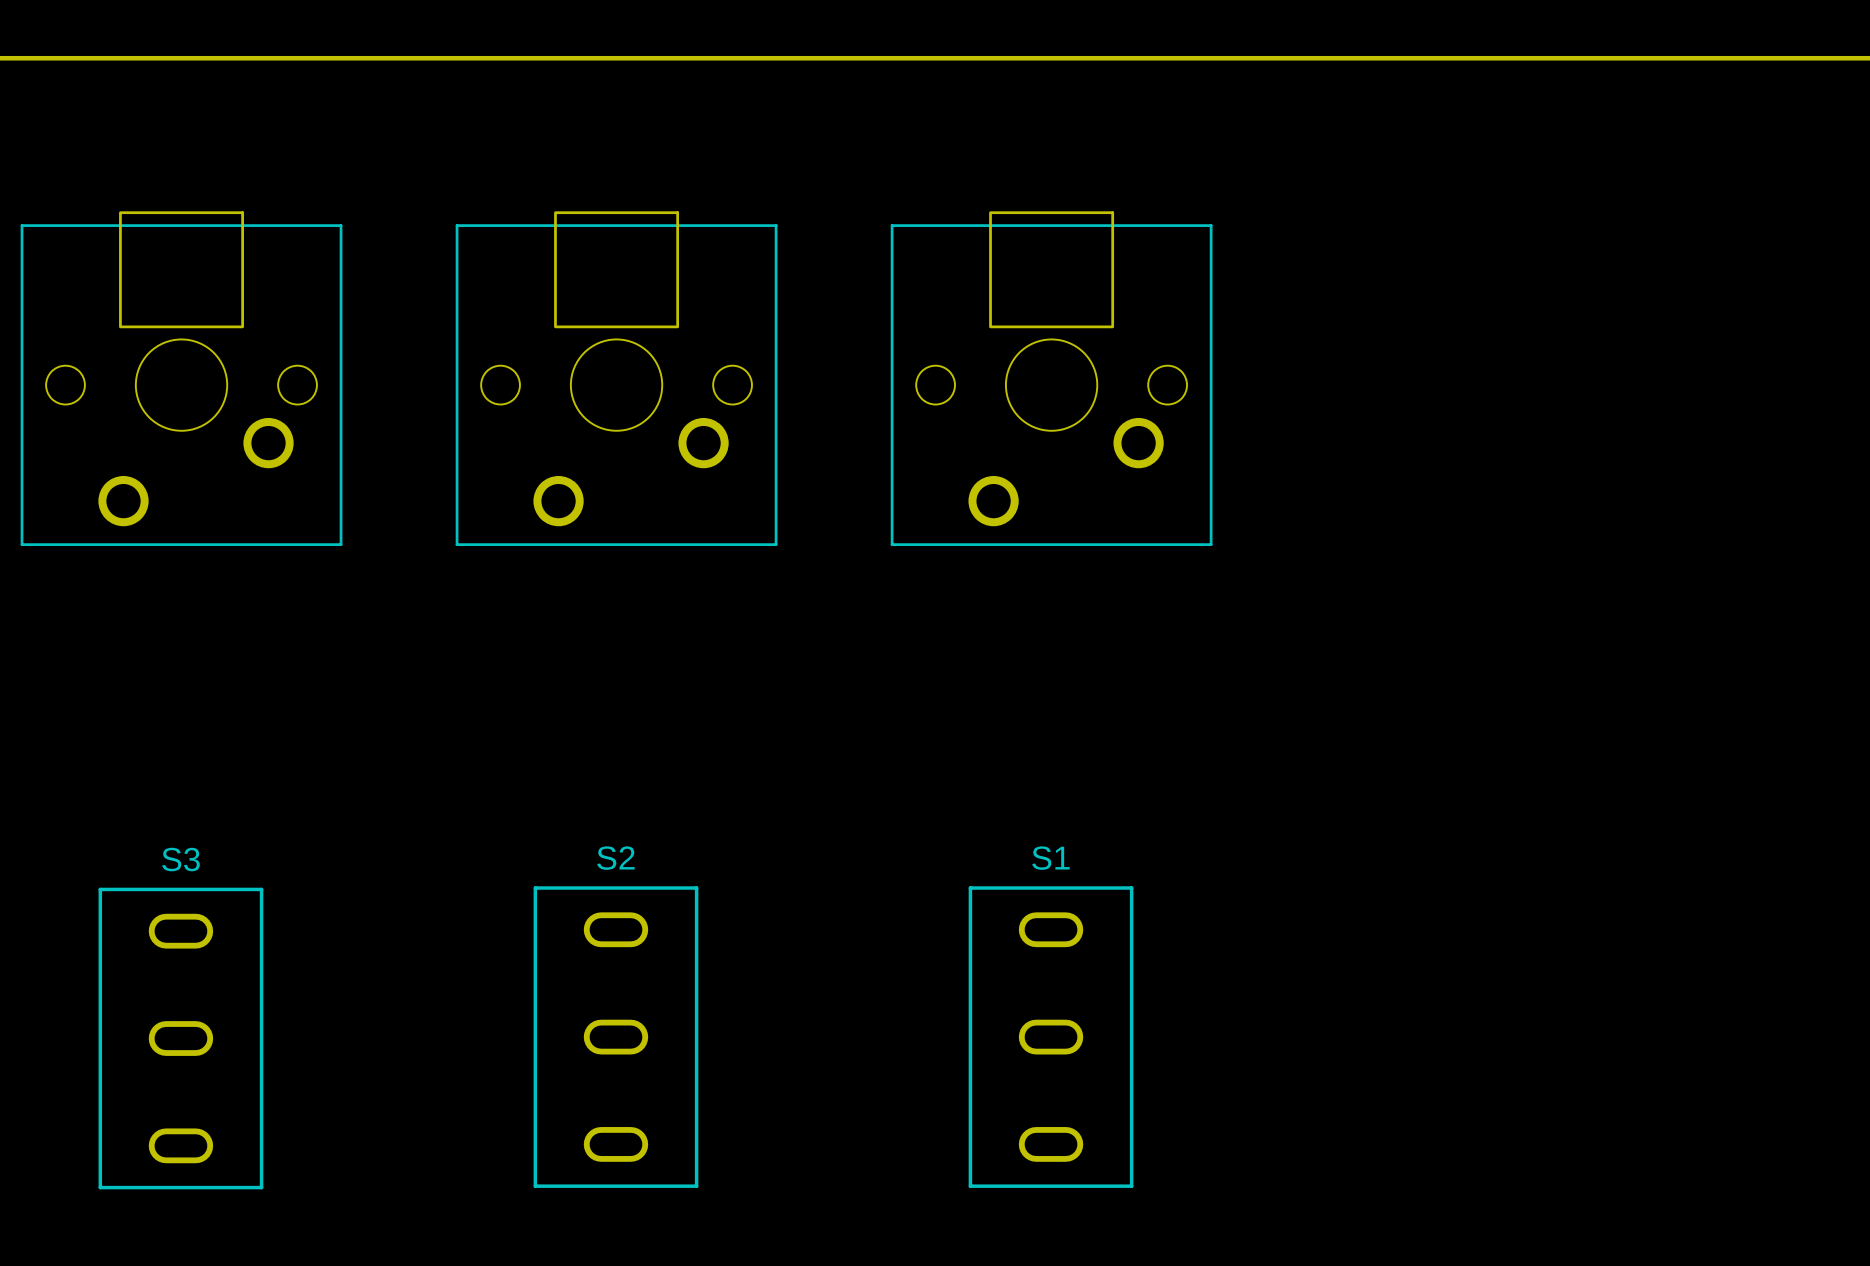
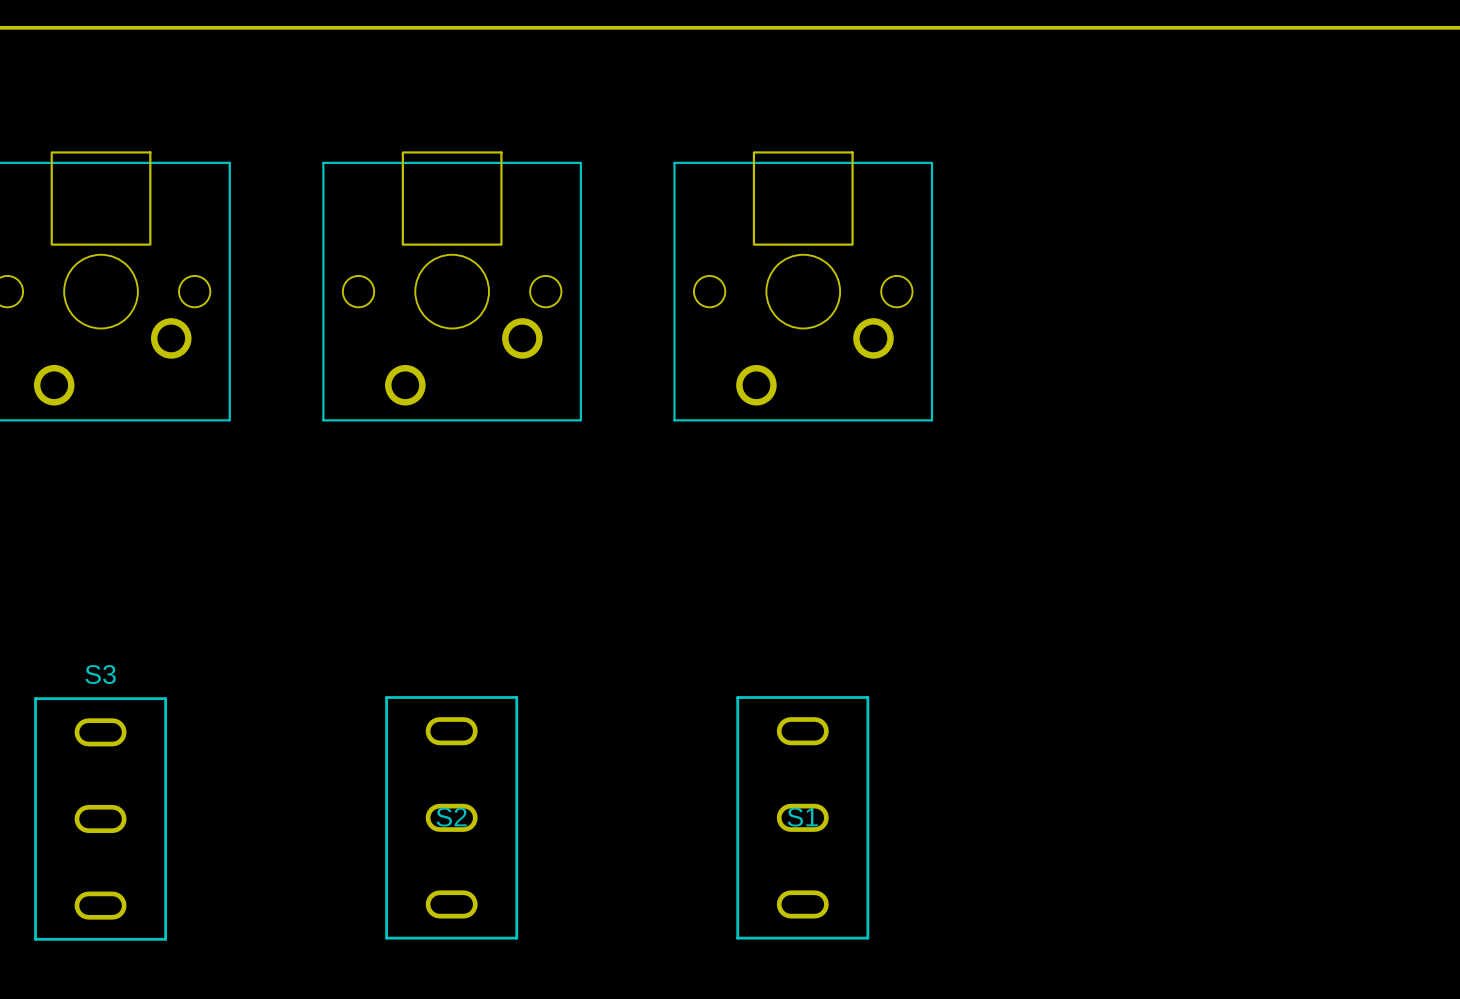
S2 name position: S2 (615, 858) -> S2 (451, 817)
S1 name position: S1 (1050, 858) -> S1 (802, 817)

